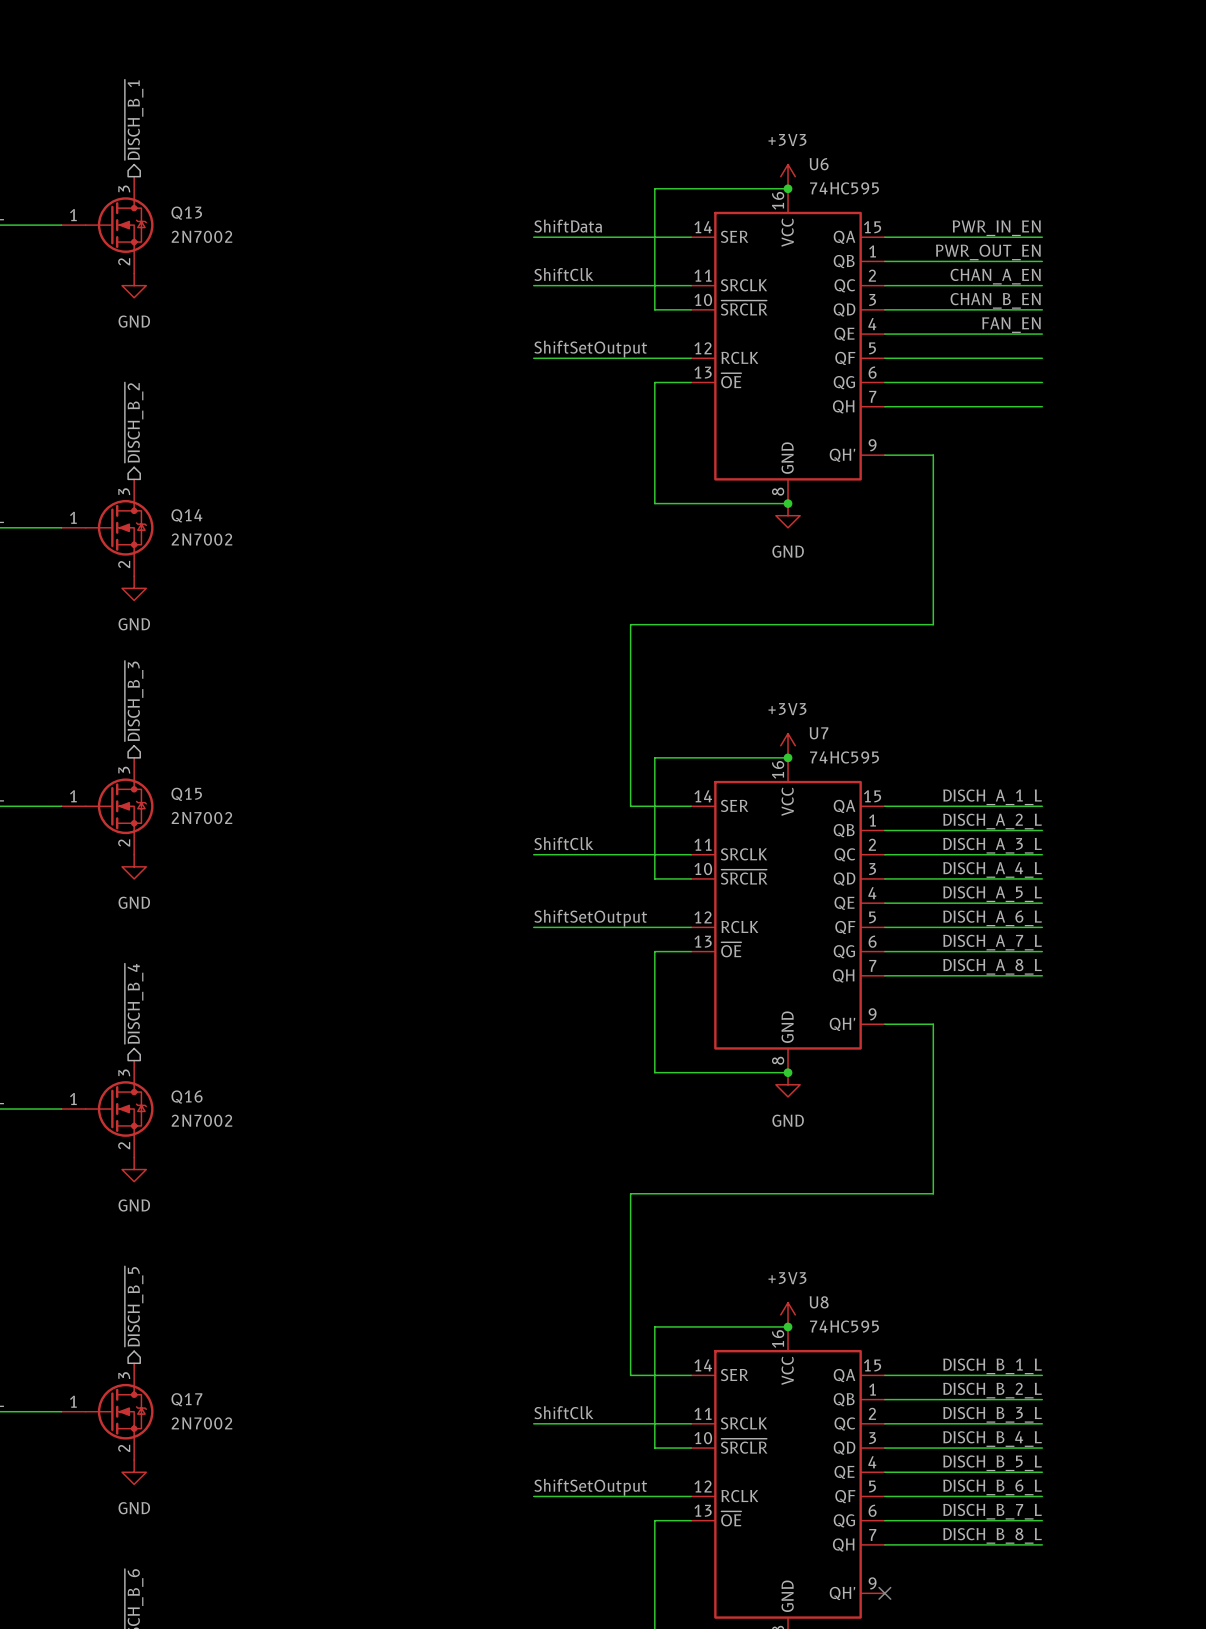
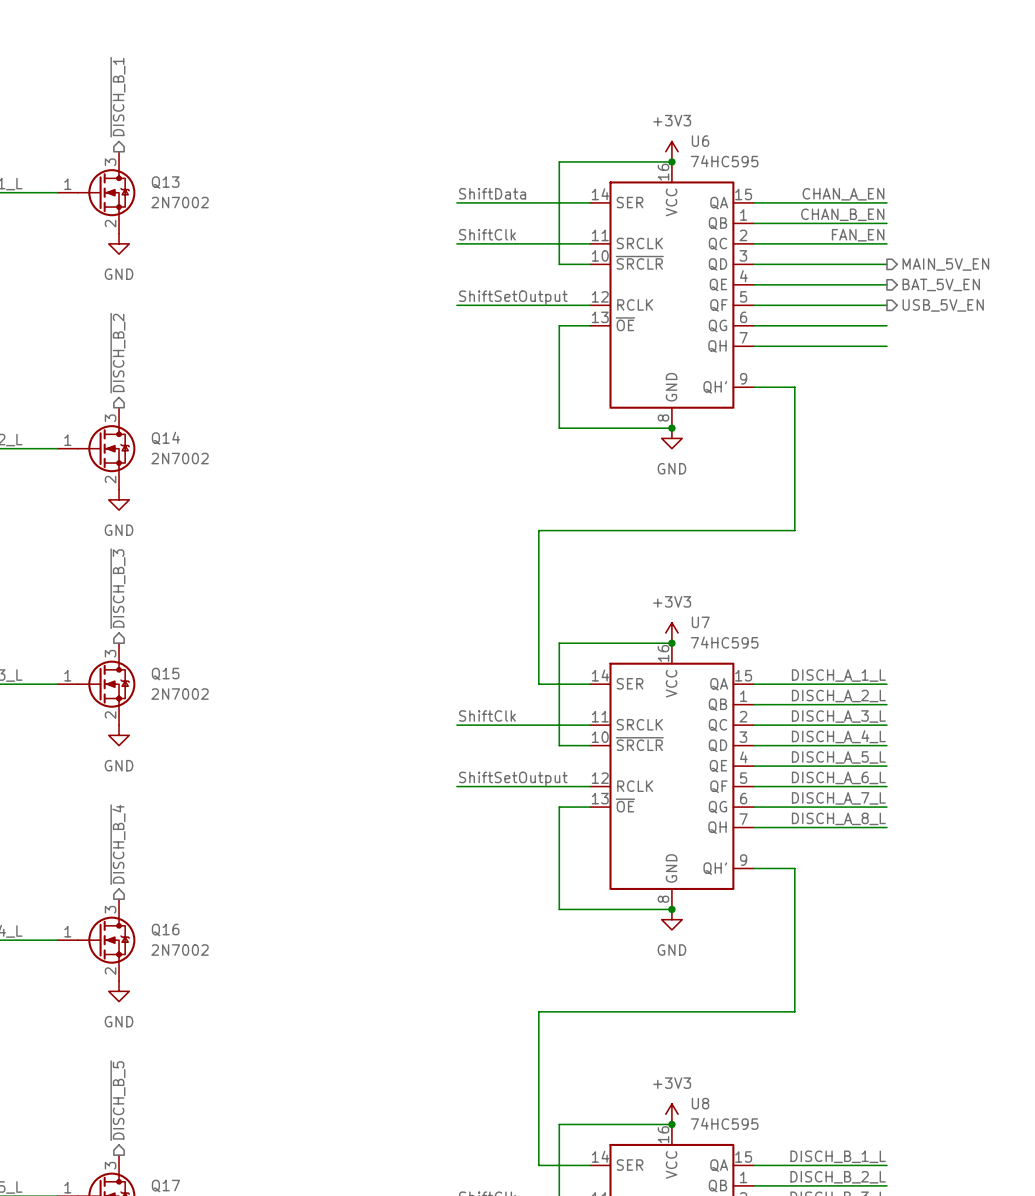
label: PWR_IN_EN (996, 228) -> CHAN_A_EN (843, 194)
label: PWR_OUT_EN (988, 252) -> CHAN_B_EN (842, 214)
label: CHAN_A_EN (995, 276) -> FAN_EN (858, 235)
label: CHAN_B_EN (995, 300) -> none
hierarchical label: none -> MAIN_5V_EN (945, 264)
label: FAN_EN (1011, 325) -> none
hierarchical label: none -> BAT_5V_EN (941, 284)
hierarchical label: none -> USB_5V_EN (943, 305)

